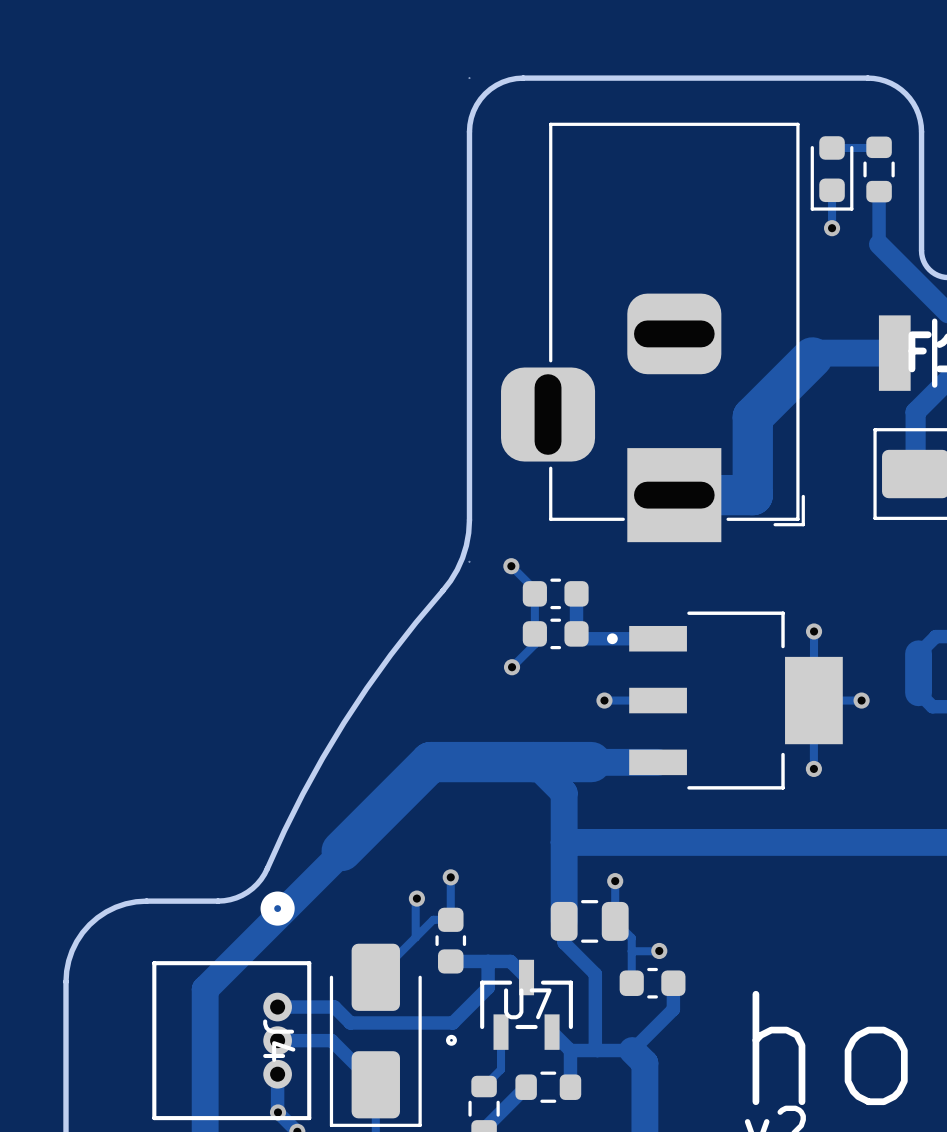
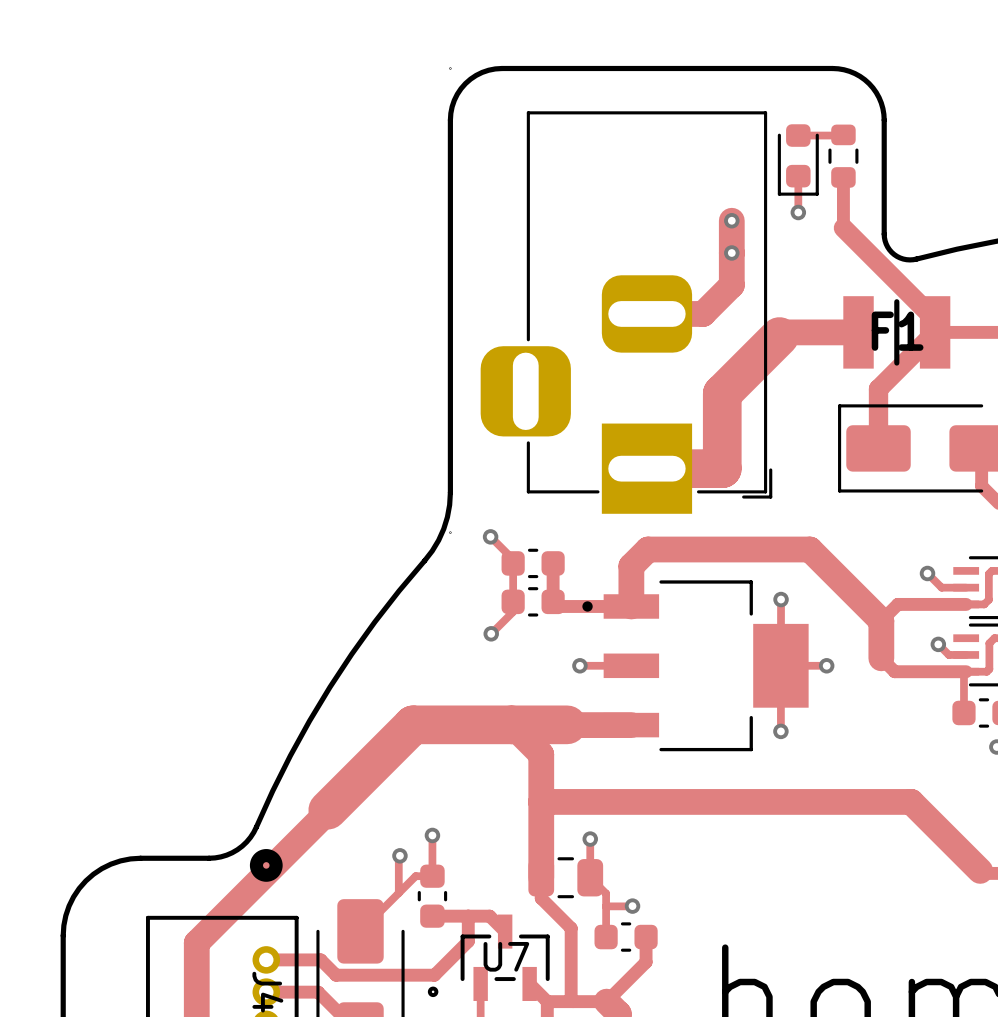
track: none -> (731, 220) (731, 285) (703, 313) (646, 313)
via: none -> (731, 220)
via: none -> (731, 252)
track: none -> (631, 606) (631, 566) (648, 549) (809, 549) (881, 620)

